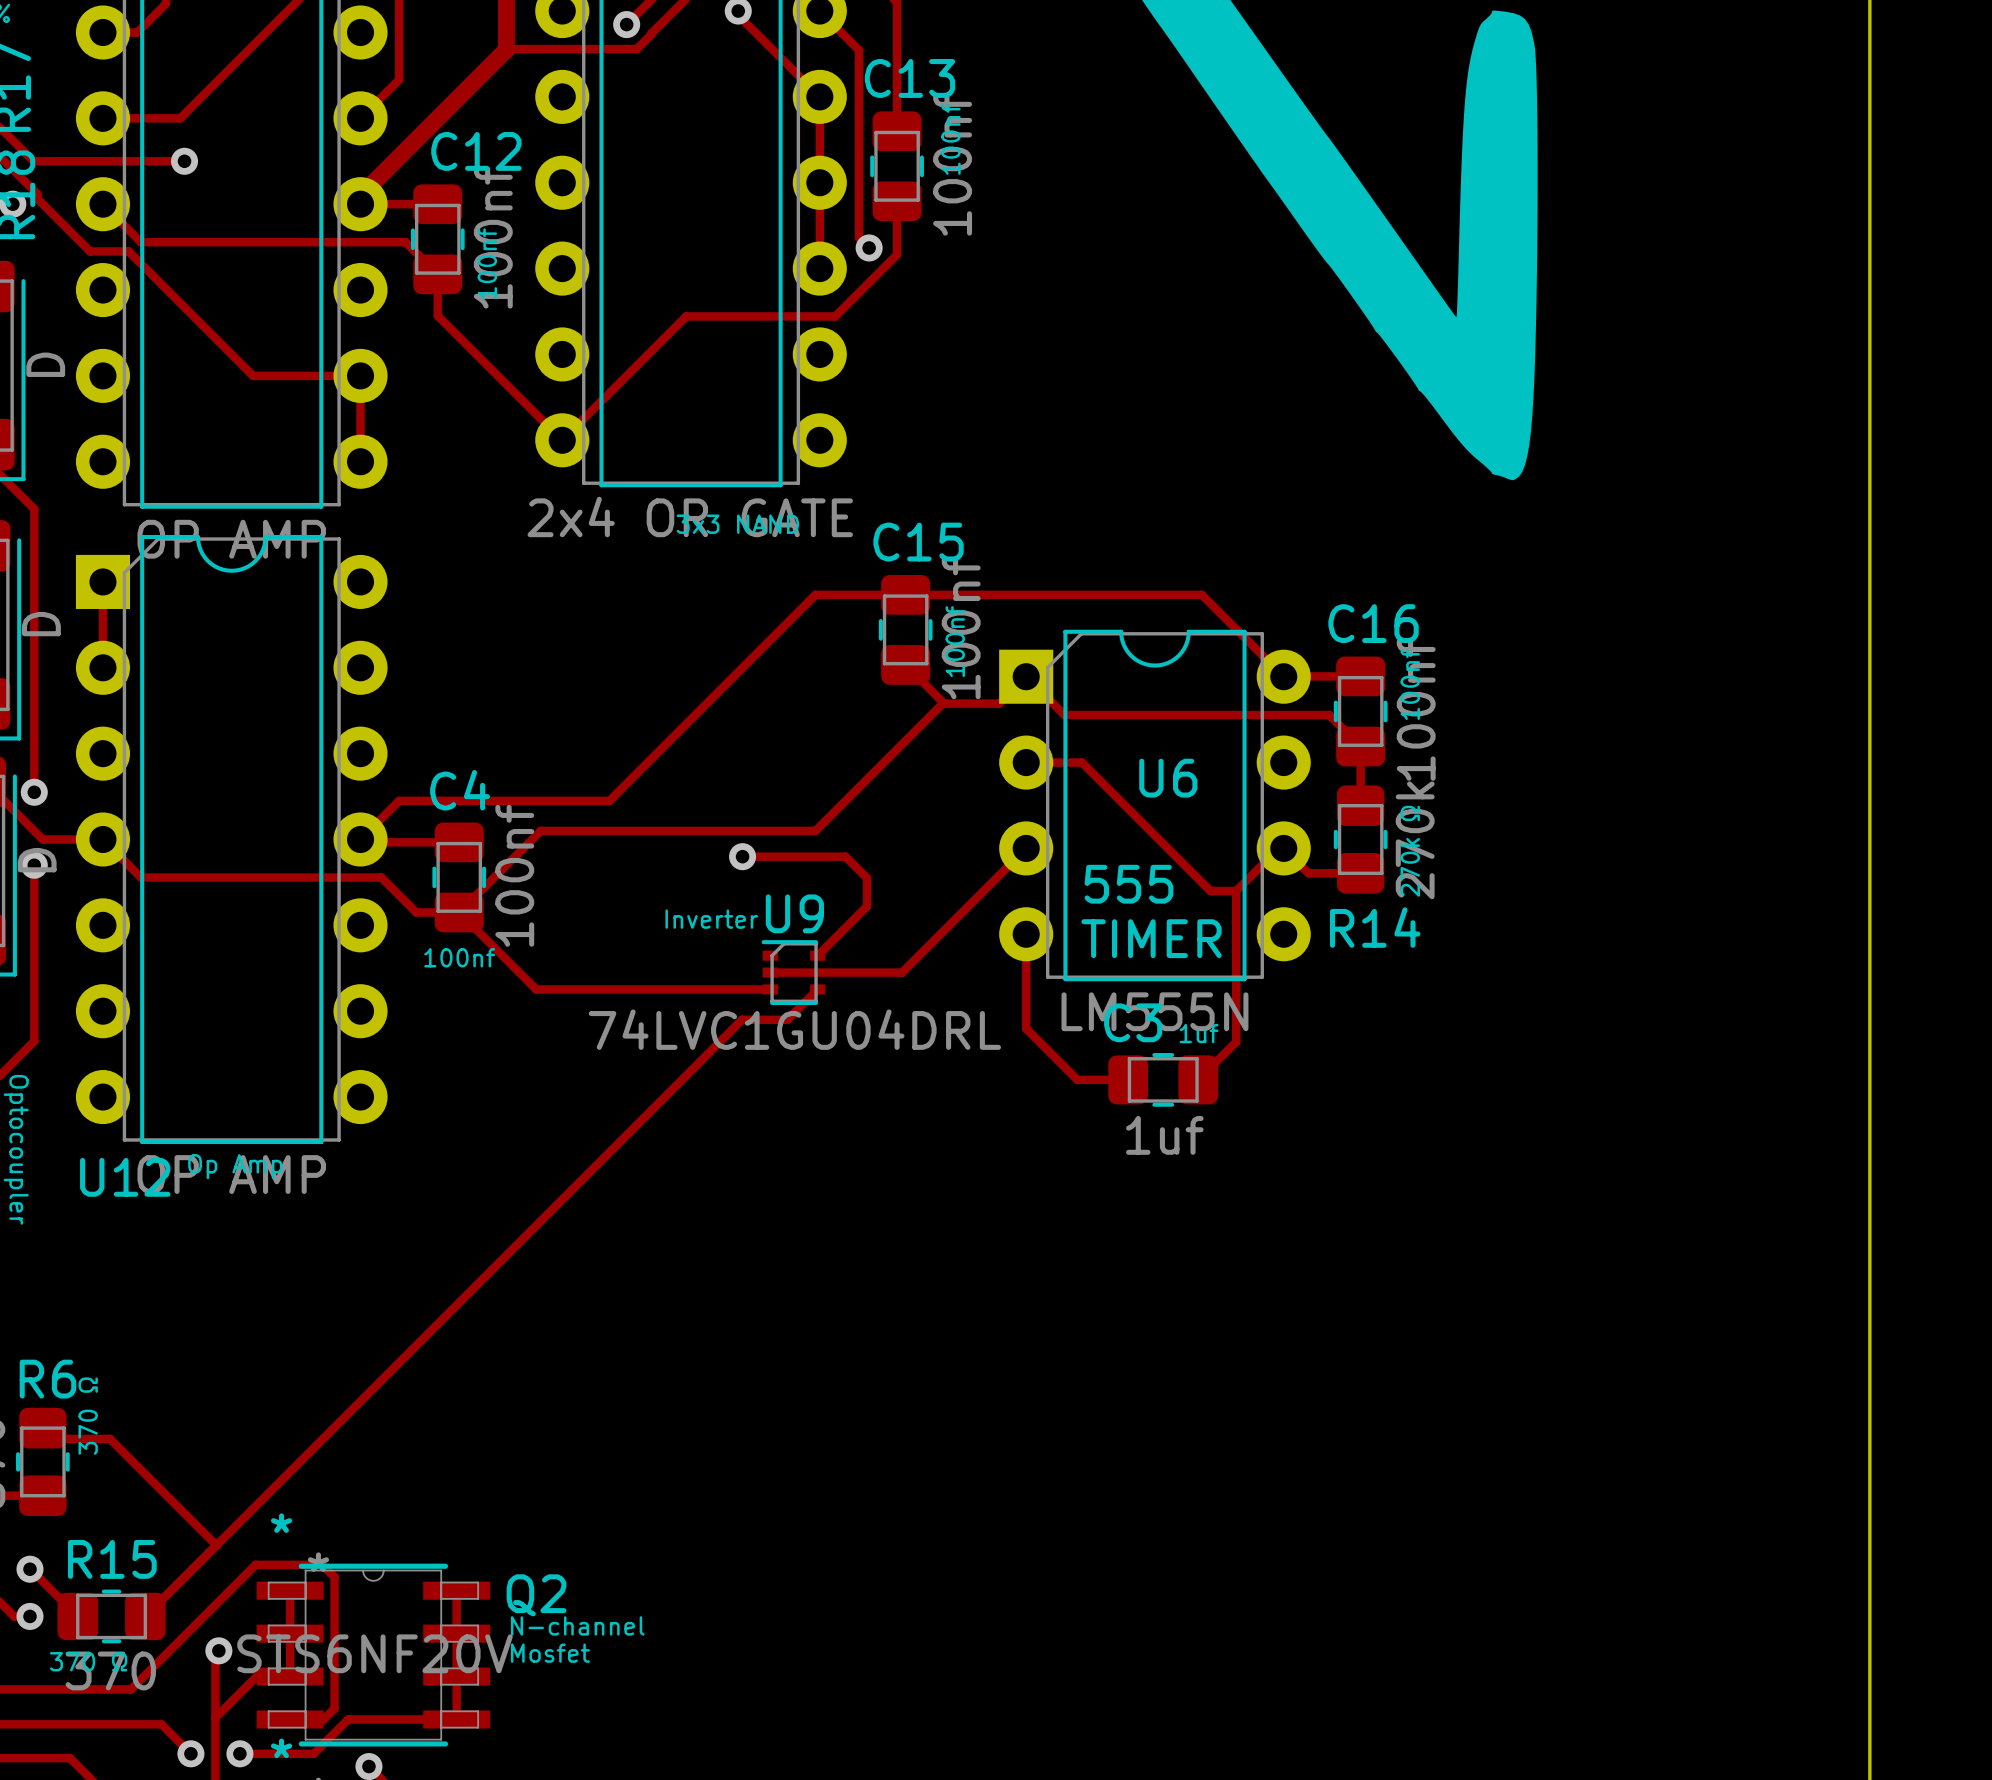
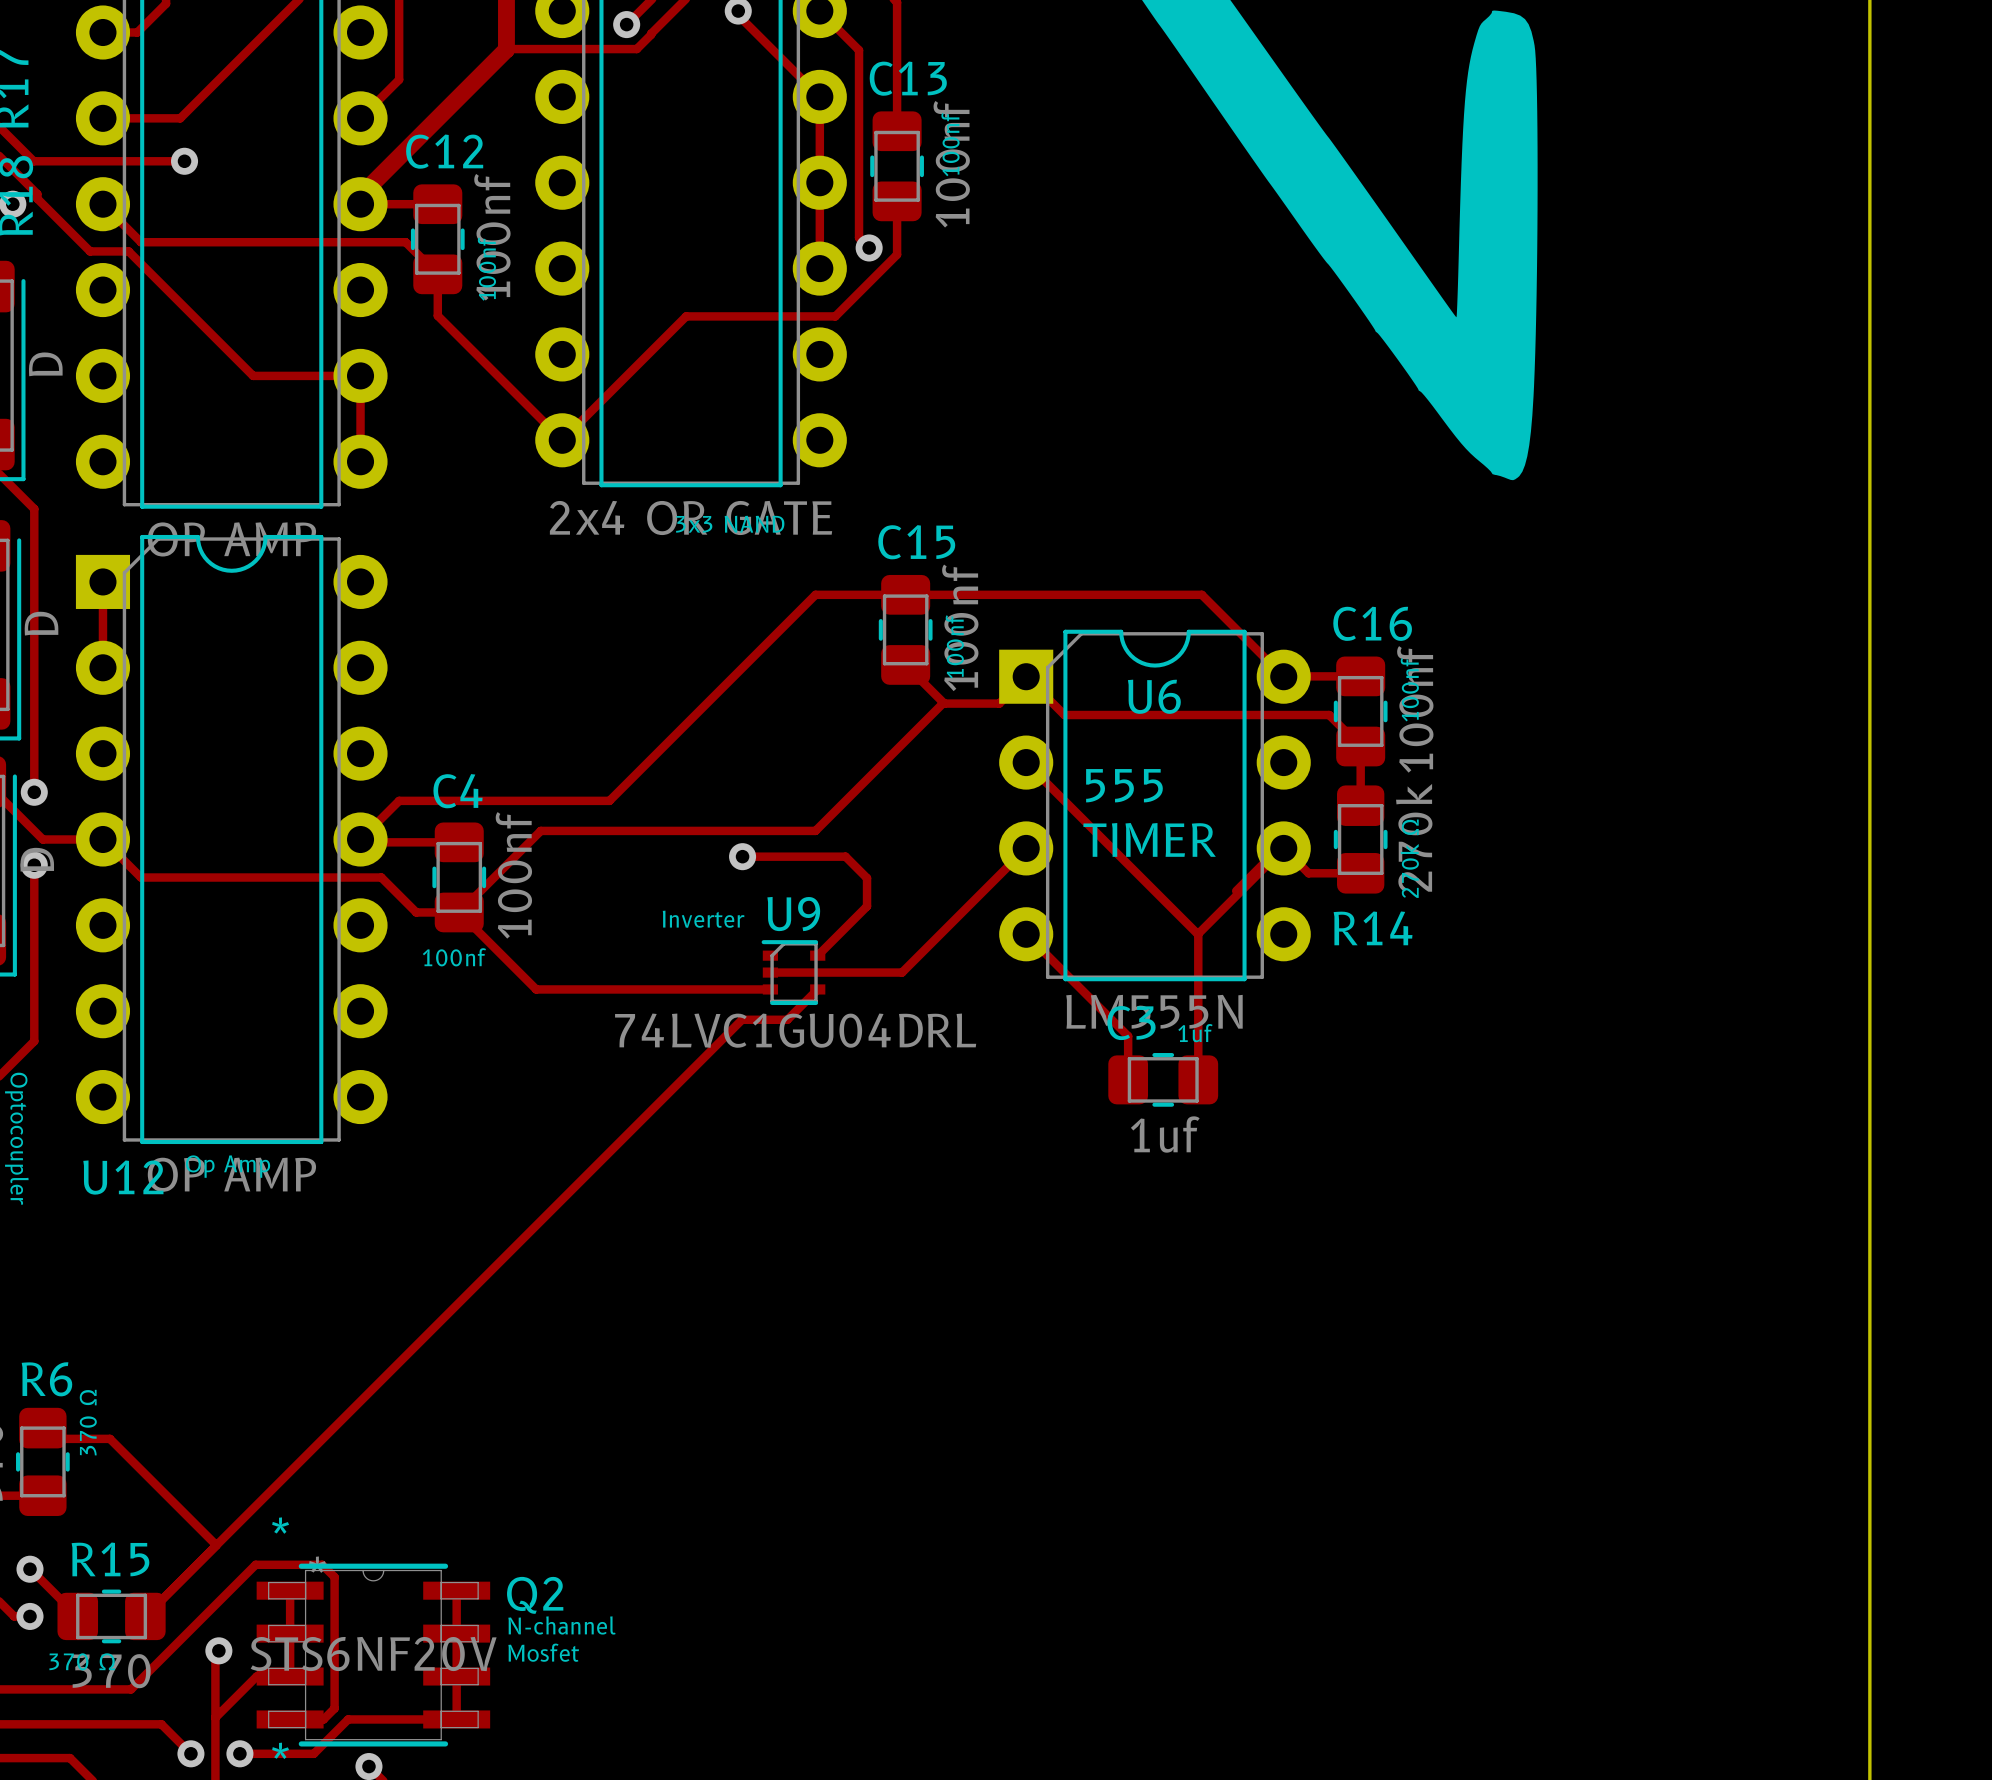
C12 name position: C12 (476, 151) -> C12 (444, 151)
track: (1026, 762) (1082, 762) (1210, 891) (1236, 891) (1236, 1041) (1198, 1079) -> (1198, 933) (1198, 1079)
track: none -> (1026, 762) (1197, 934) (1283, 848)
U6 name position: U6 (1168, 778) -> U6 (1154, 696)
text position: 555 (1128, 884) -> 555 (1124, 785)
track: (1026, 934) (1026, 1028) (1077, 1079) (1128, 1079) -> (1026, 934) (1128, 1036) (1128, 1079)
text position: TIMER (1151, 938) -> TIMER (1149, 839)

